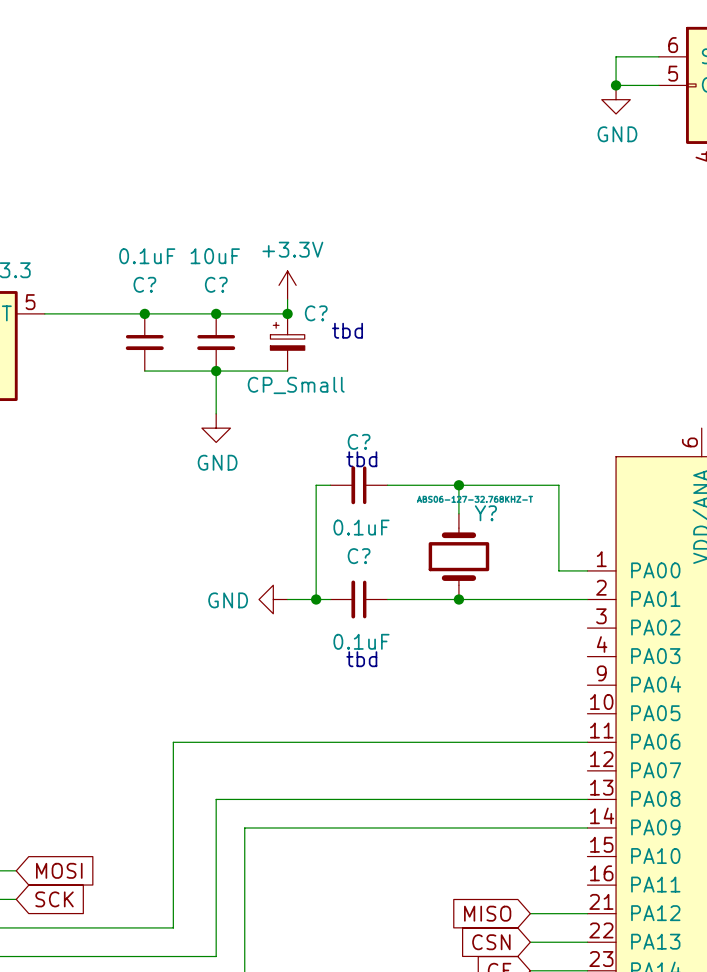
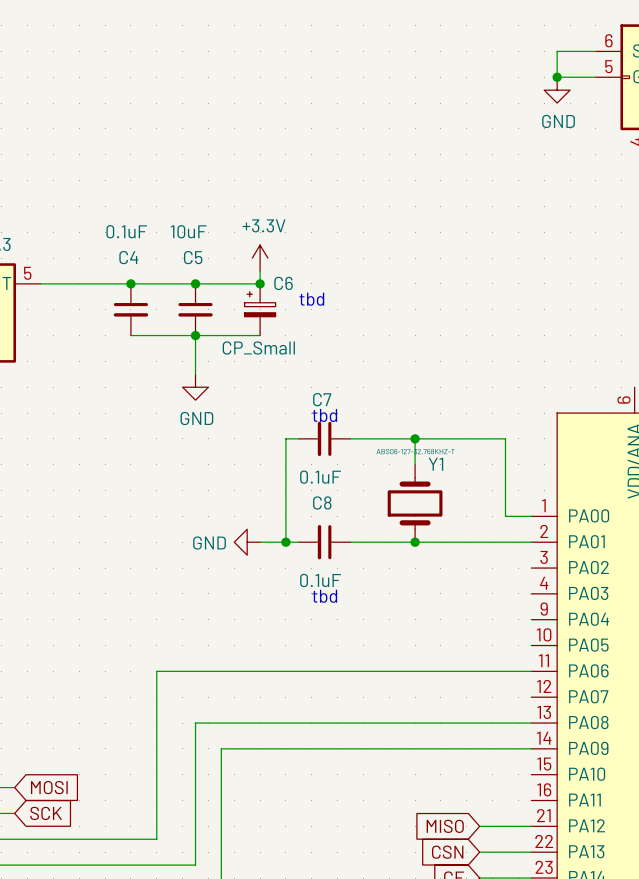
C? name: C? (144, 284) -> C4 (128, 257)
C? name: C? (216, 284) -> C5 (193, 257)
C? name: C? (316, 313) -> C6 (283, 283)
C? name: C? (359, 441) -> C7 (322, 399)
Y? name: Y? (485, 513) -> Y1 (435, 464)
C? name: C? (359, 556) -> C8 (322, 502)

